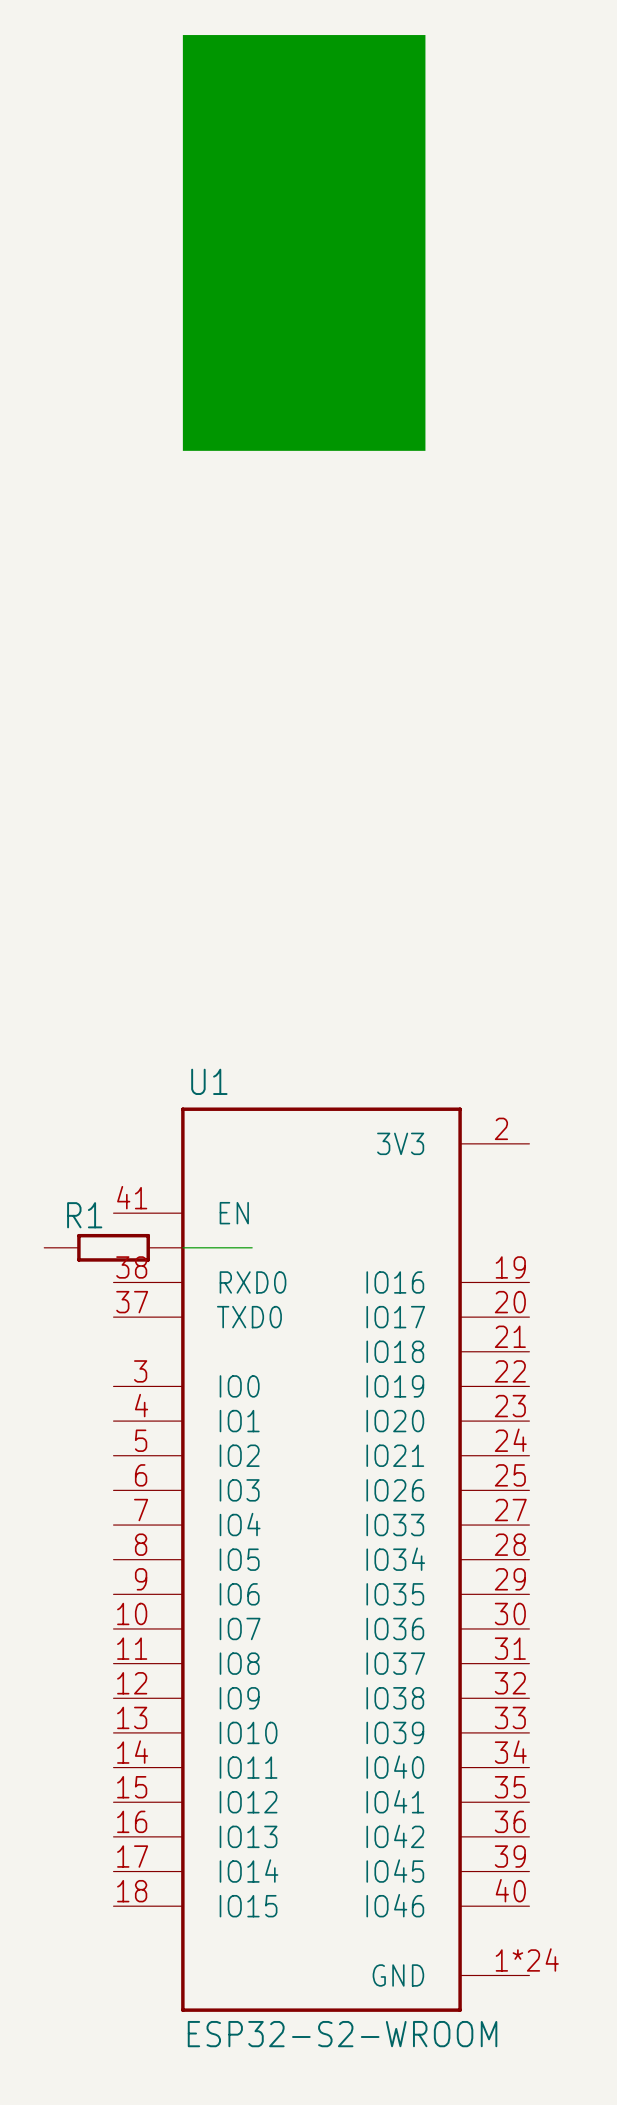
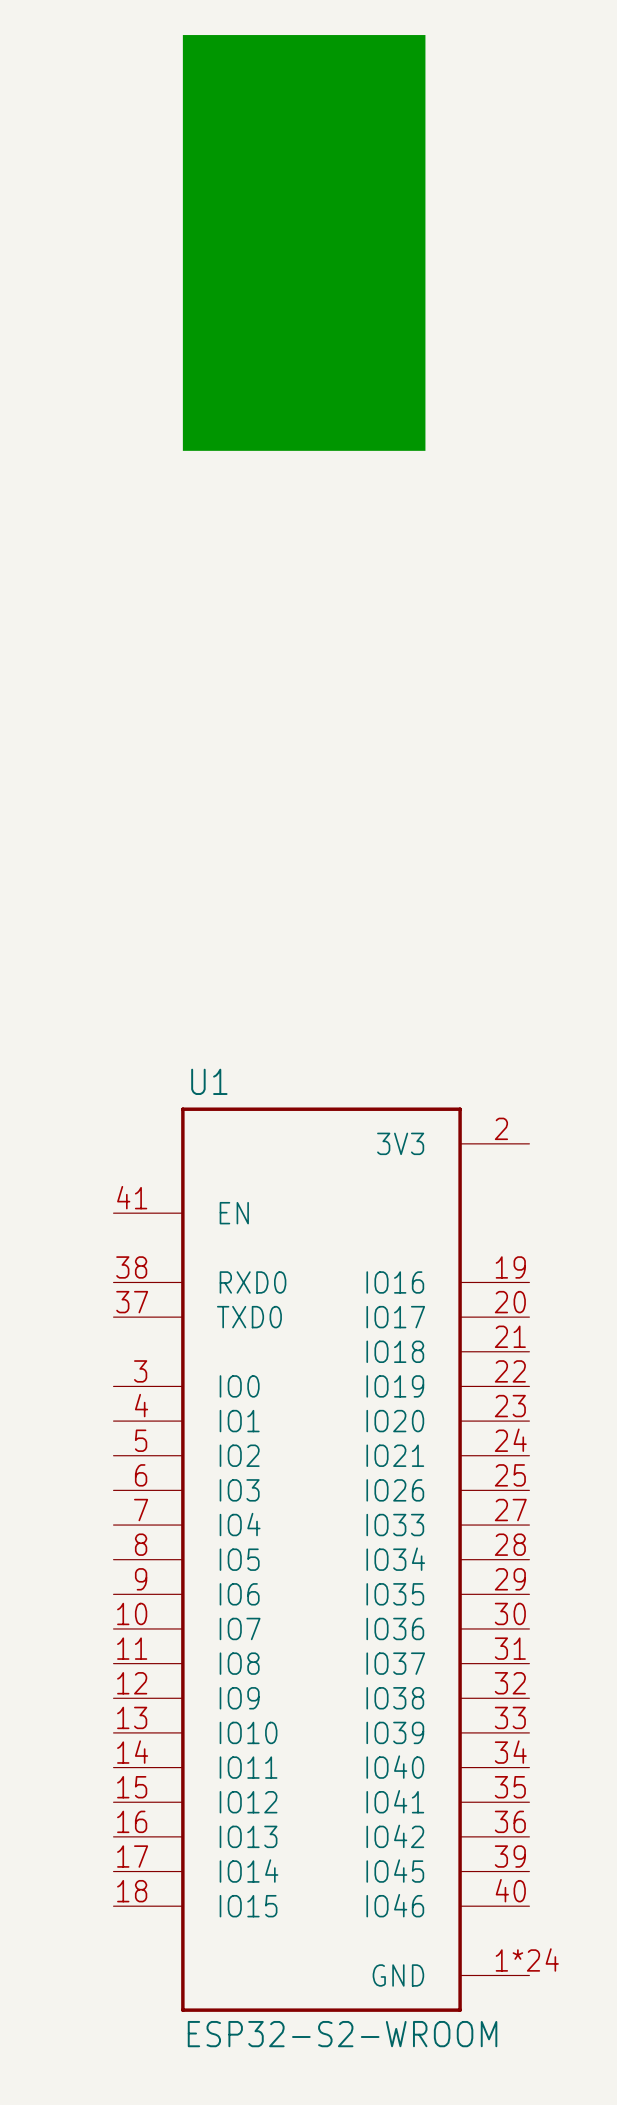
R1: (113, 1247) -> none
wire: (182, 1247) (252, 1247) -> none

